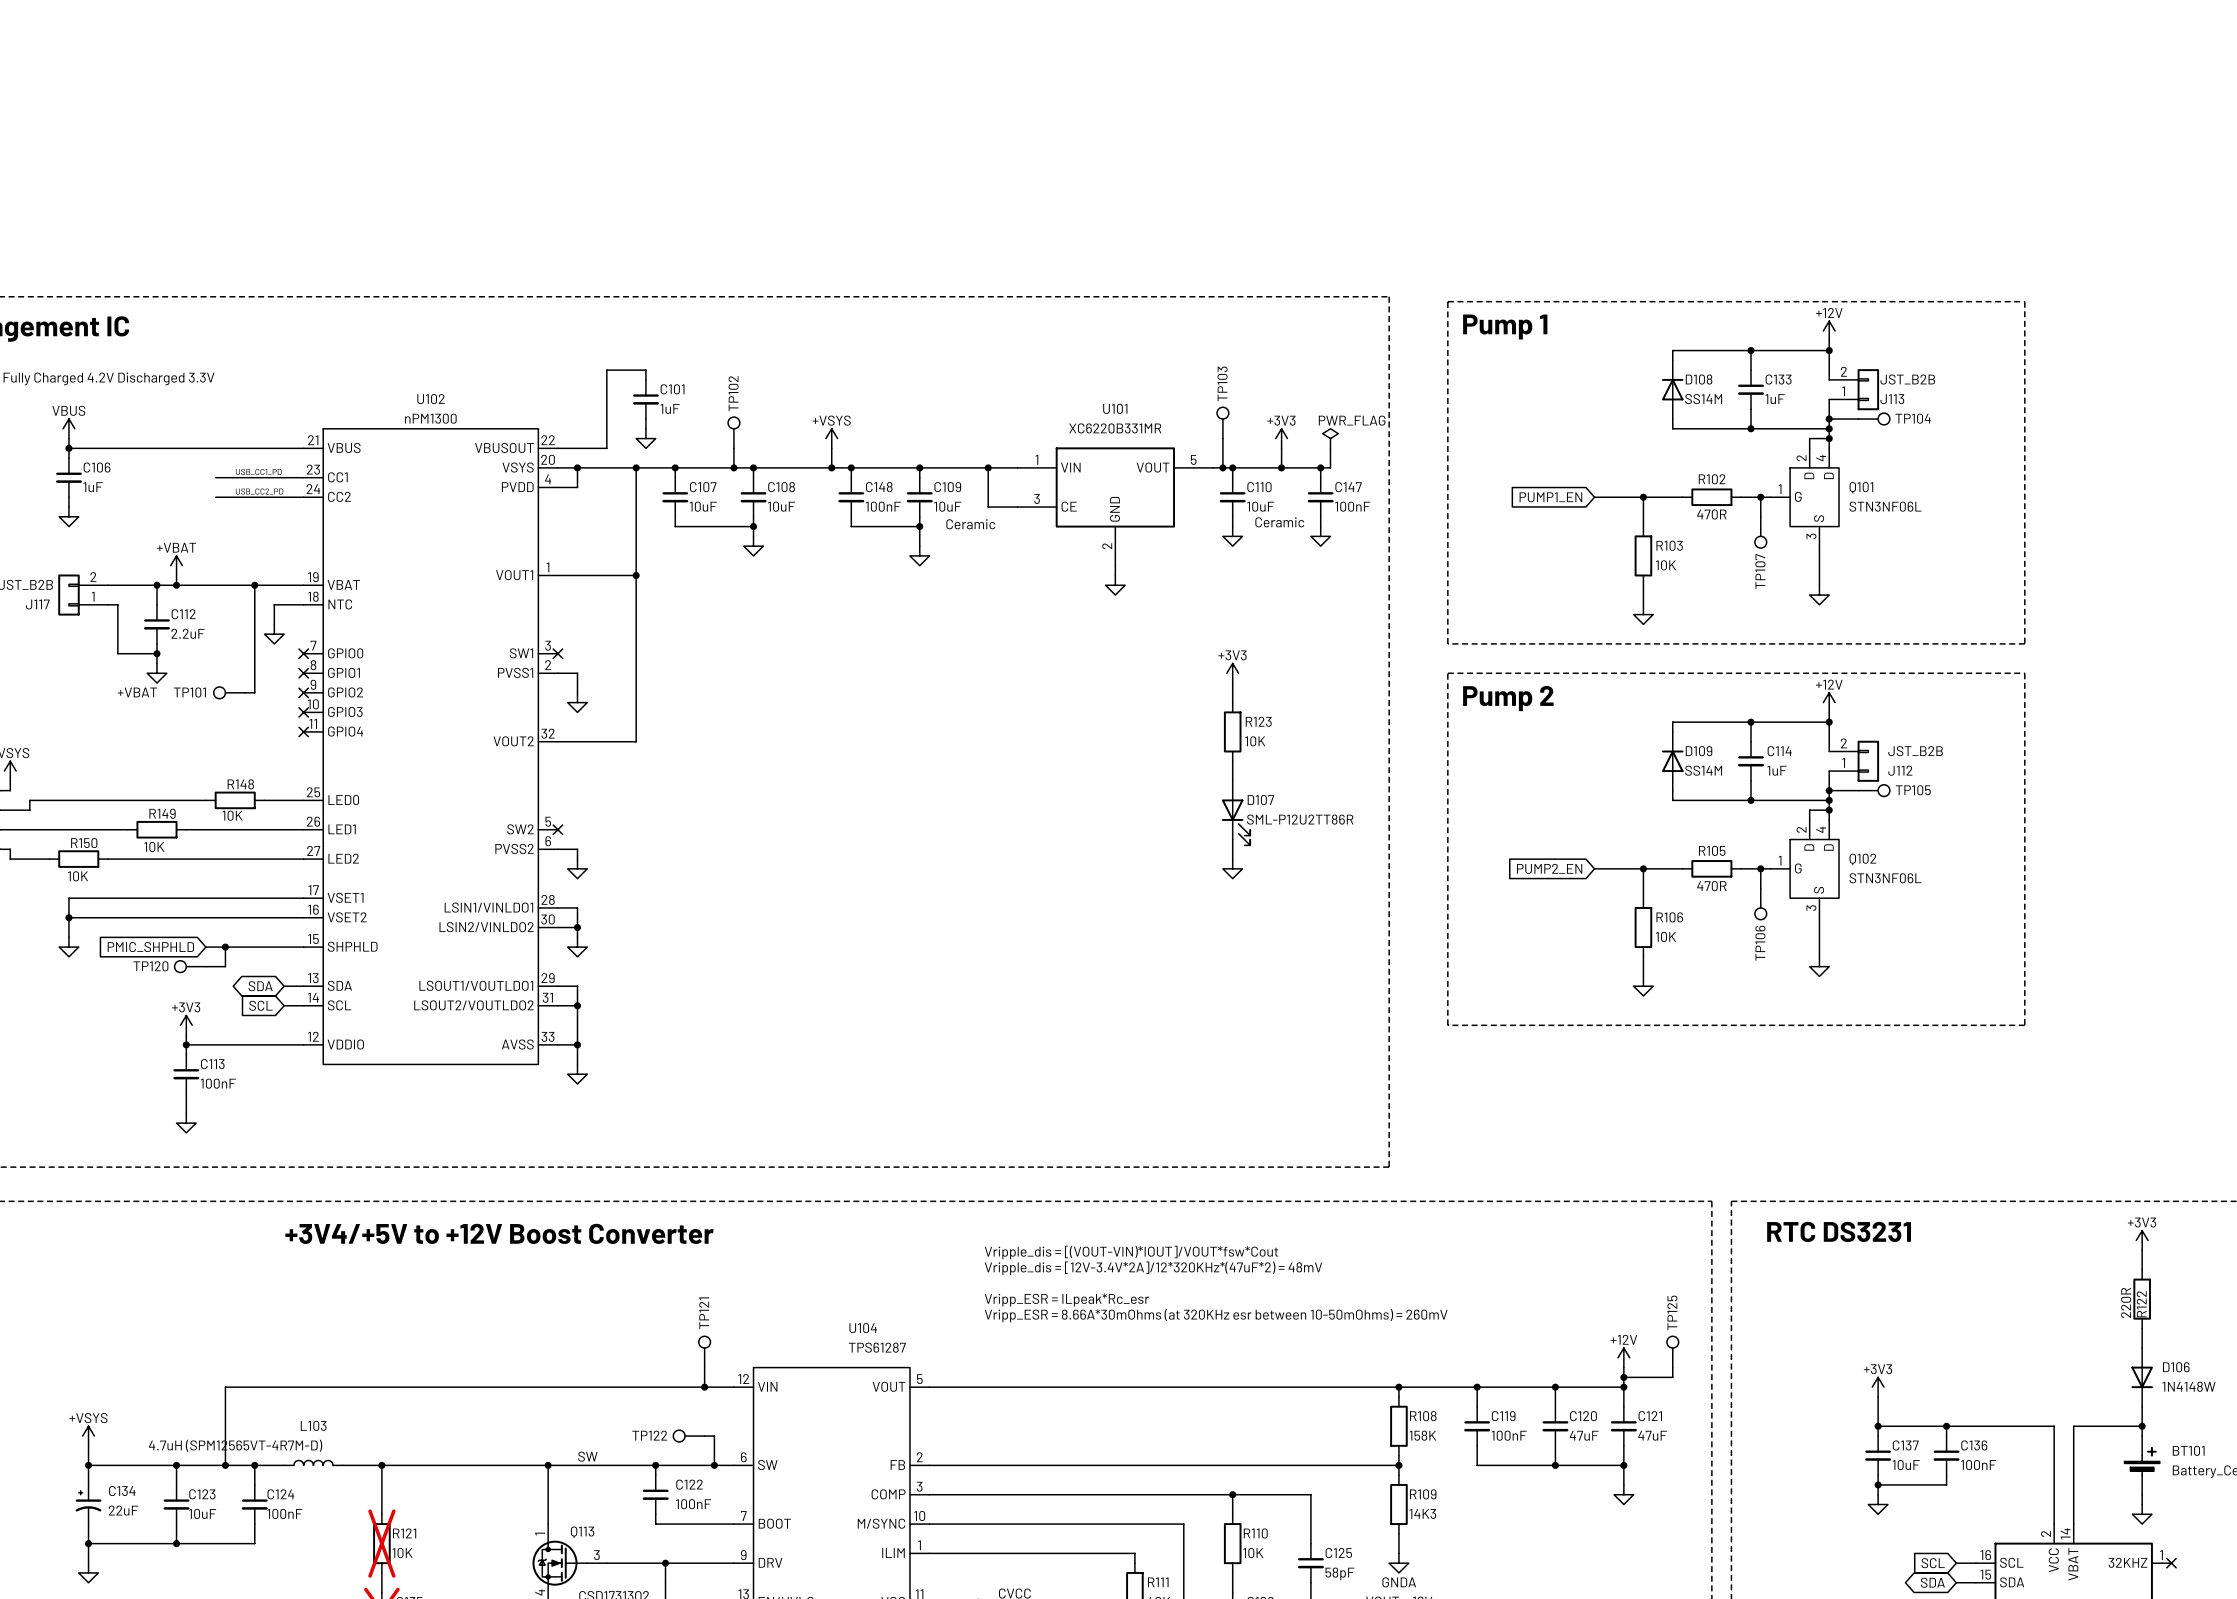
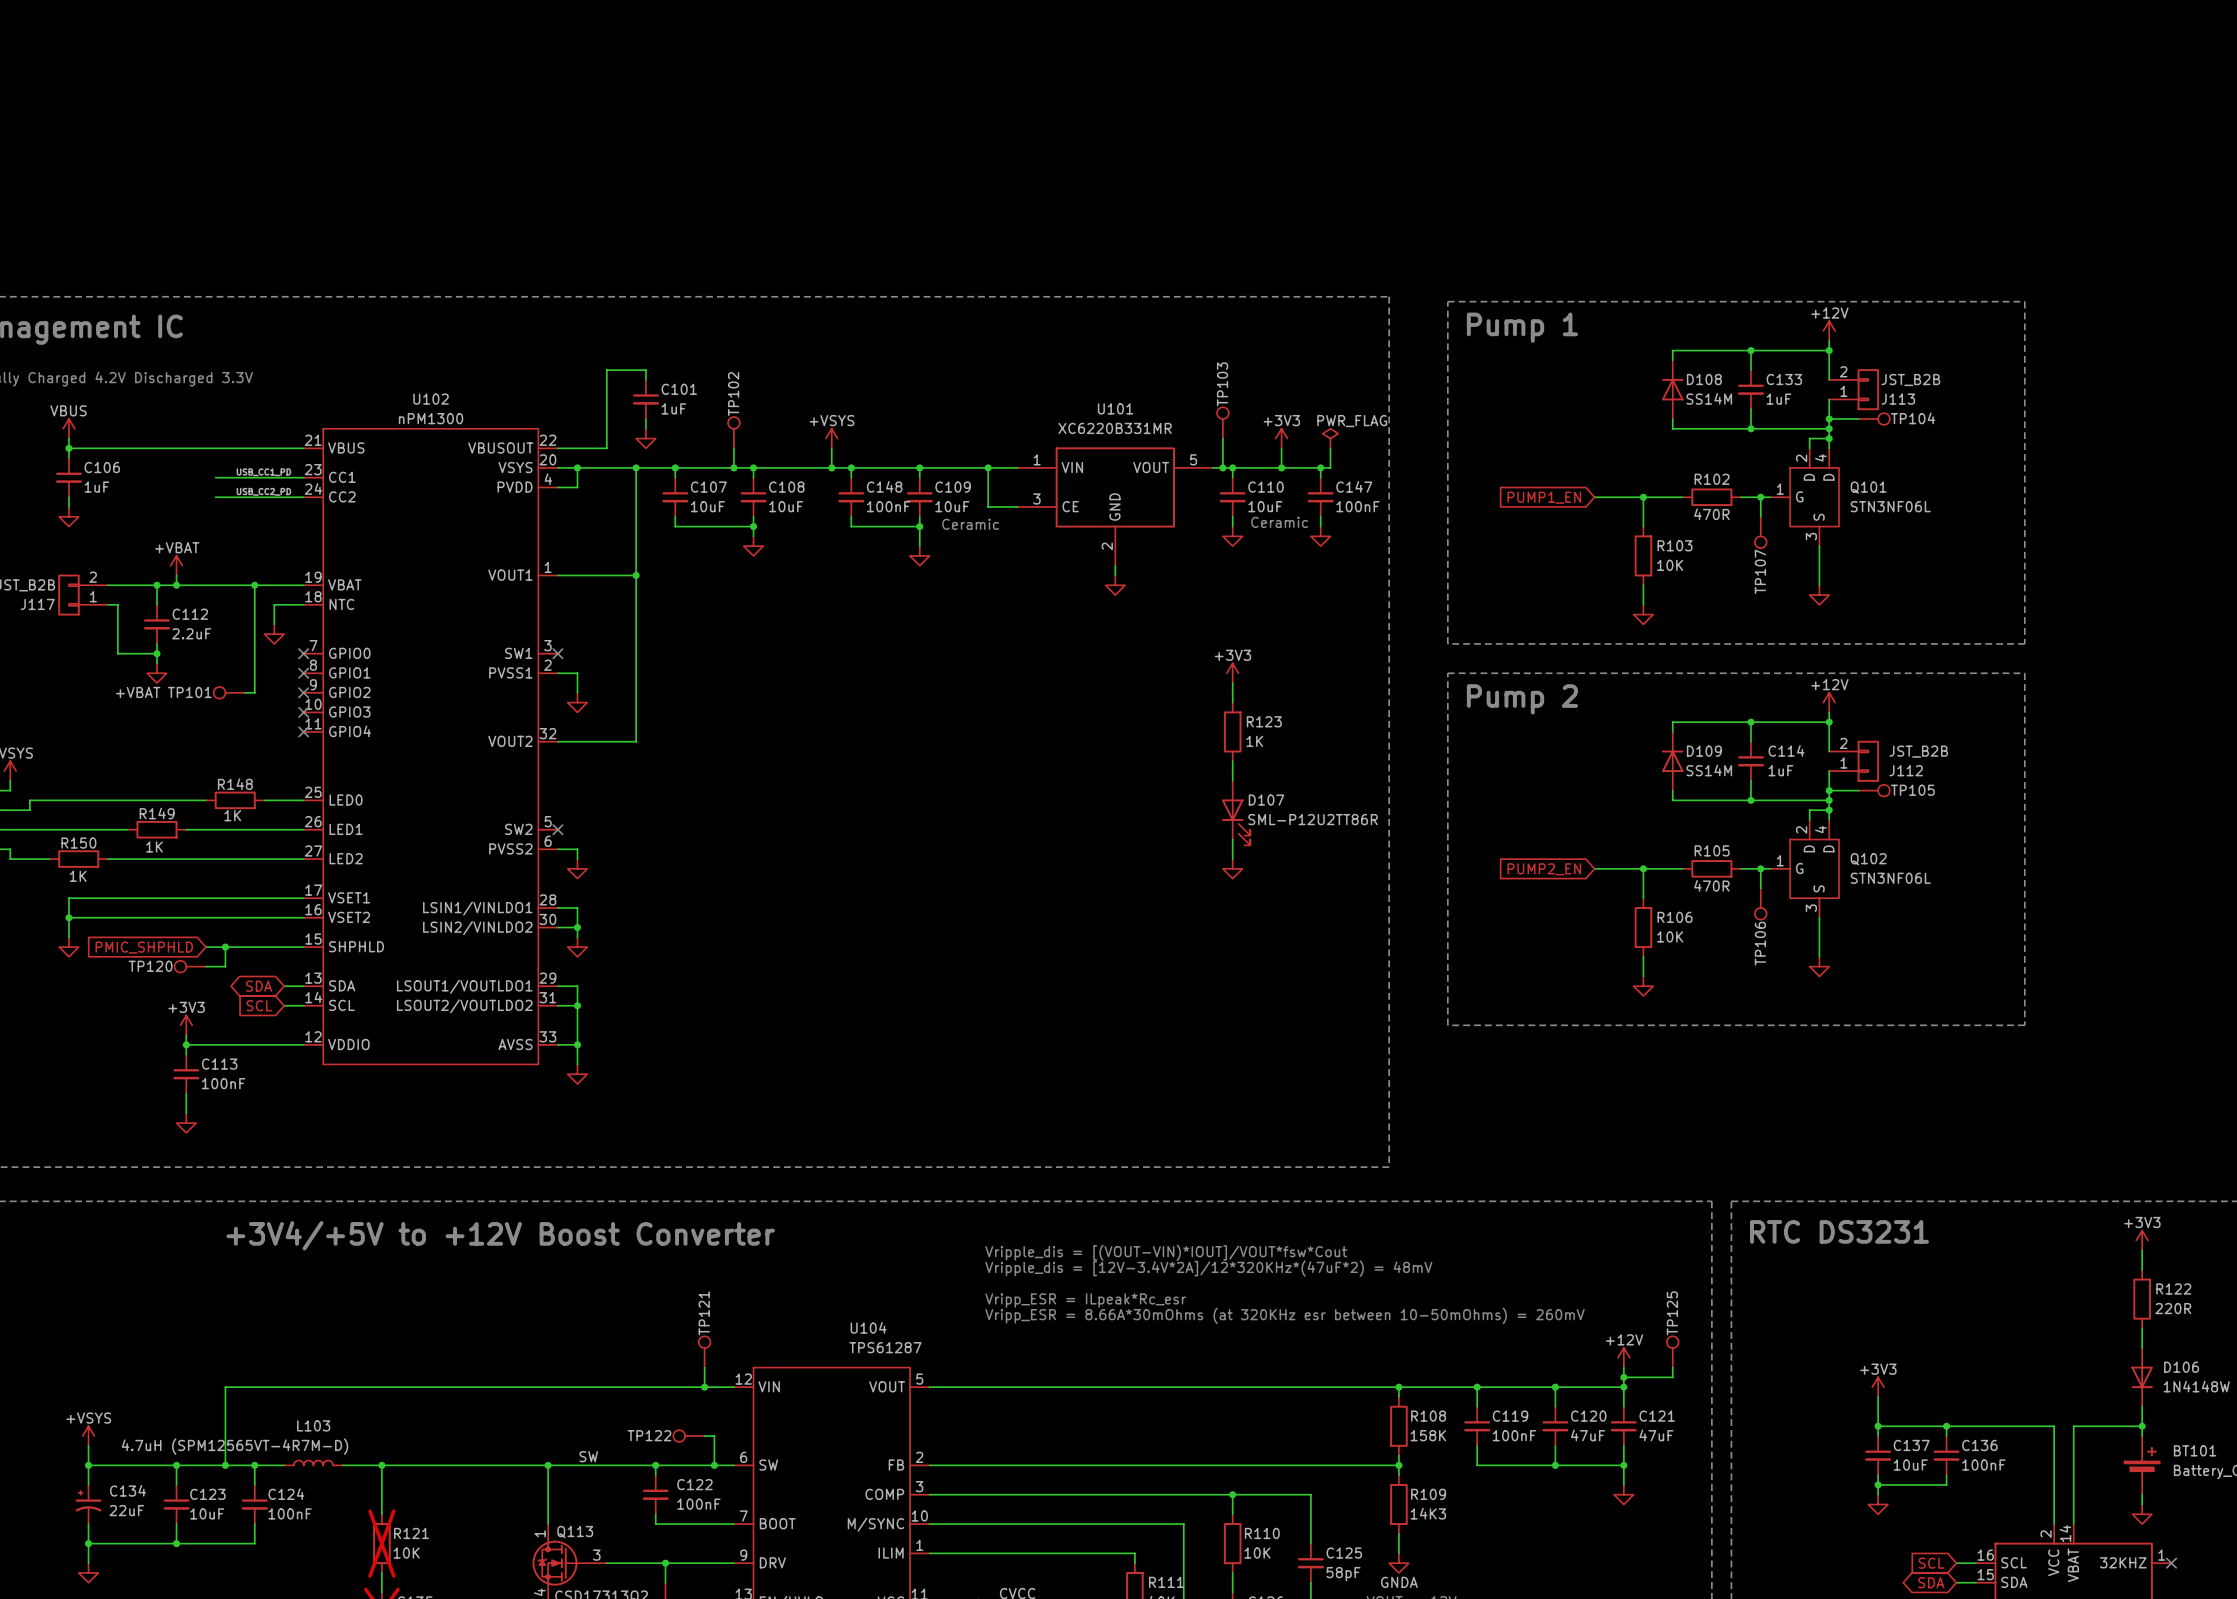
R123 value: 10K (1255, 741) -> 1K (1254, 741)
R148 value: 10K (232, 815) -> 1K (232, 815)
R149 value: 10K (154, 846) -> 1K (154, 846)
R150 value: 10K (78, 876) -> 1K (78, 876)
R122 value rotation: 0° (2126, 1302) -> 90° clockwise (2173, 1308)
R122 value position: 220R (2126, 1302) -> 220R (2173, 1308)
R122 name rotation: 0° (2141, 1304) -> 90° clockwise (2173, 1288)

